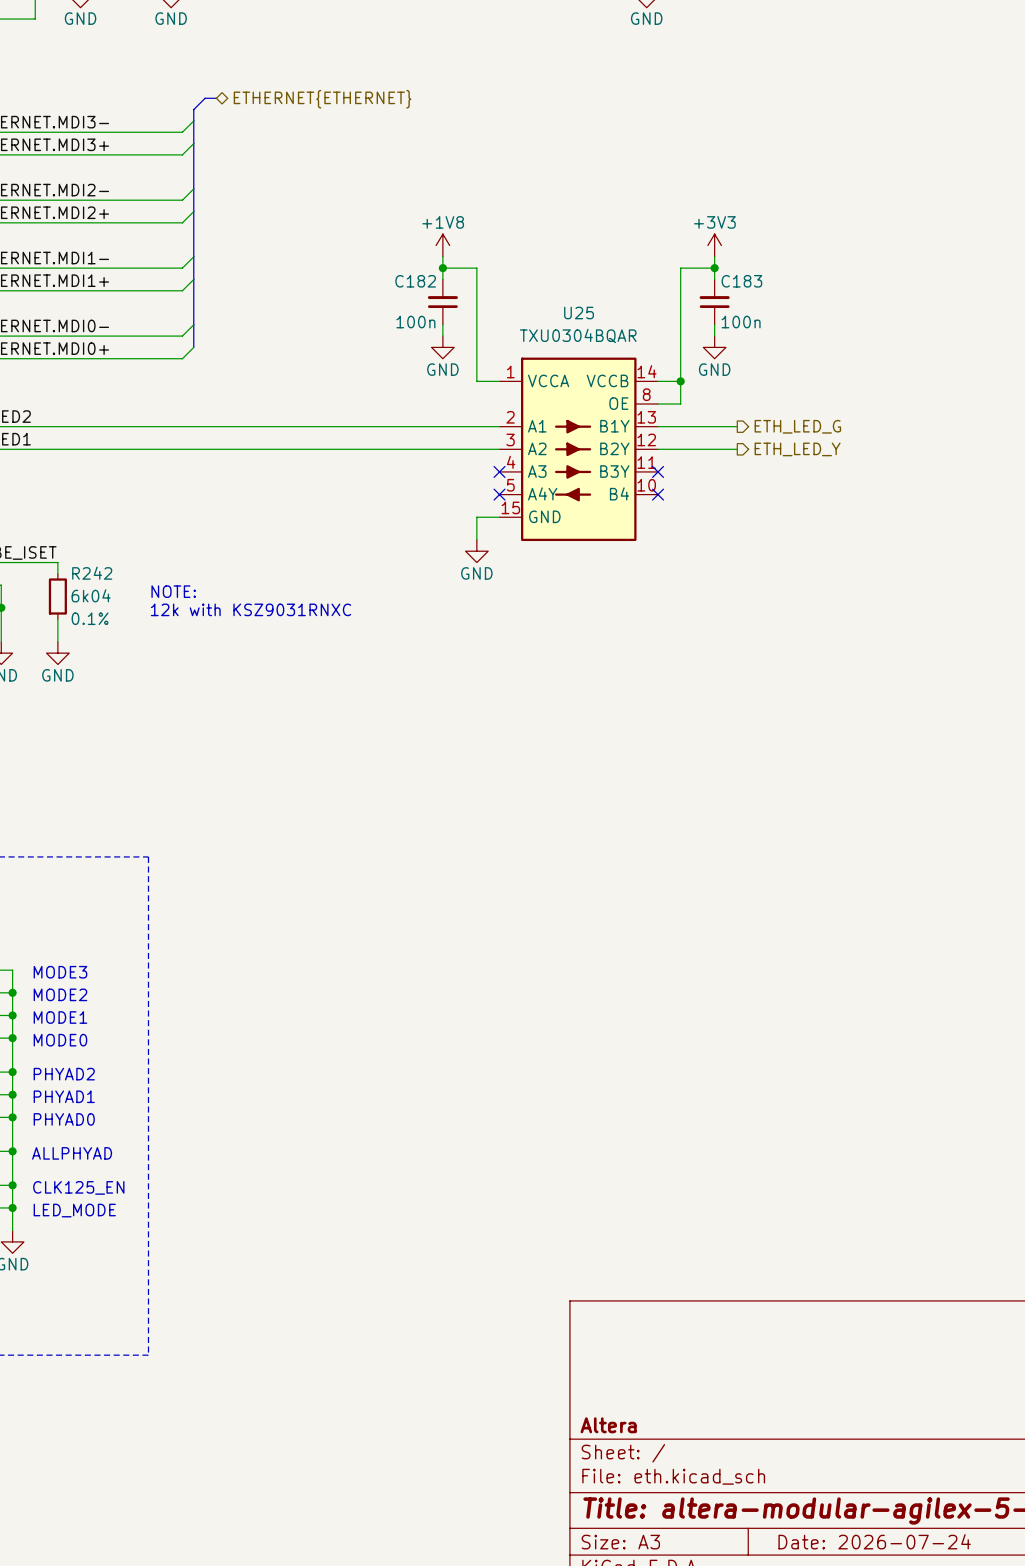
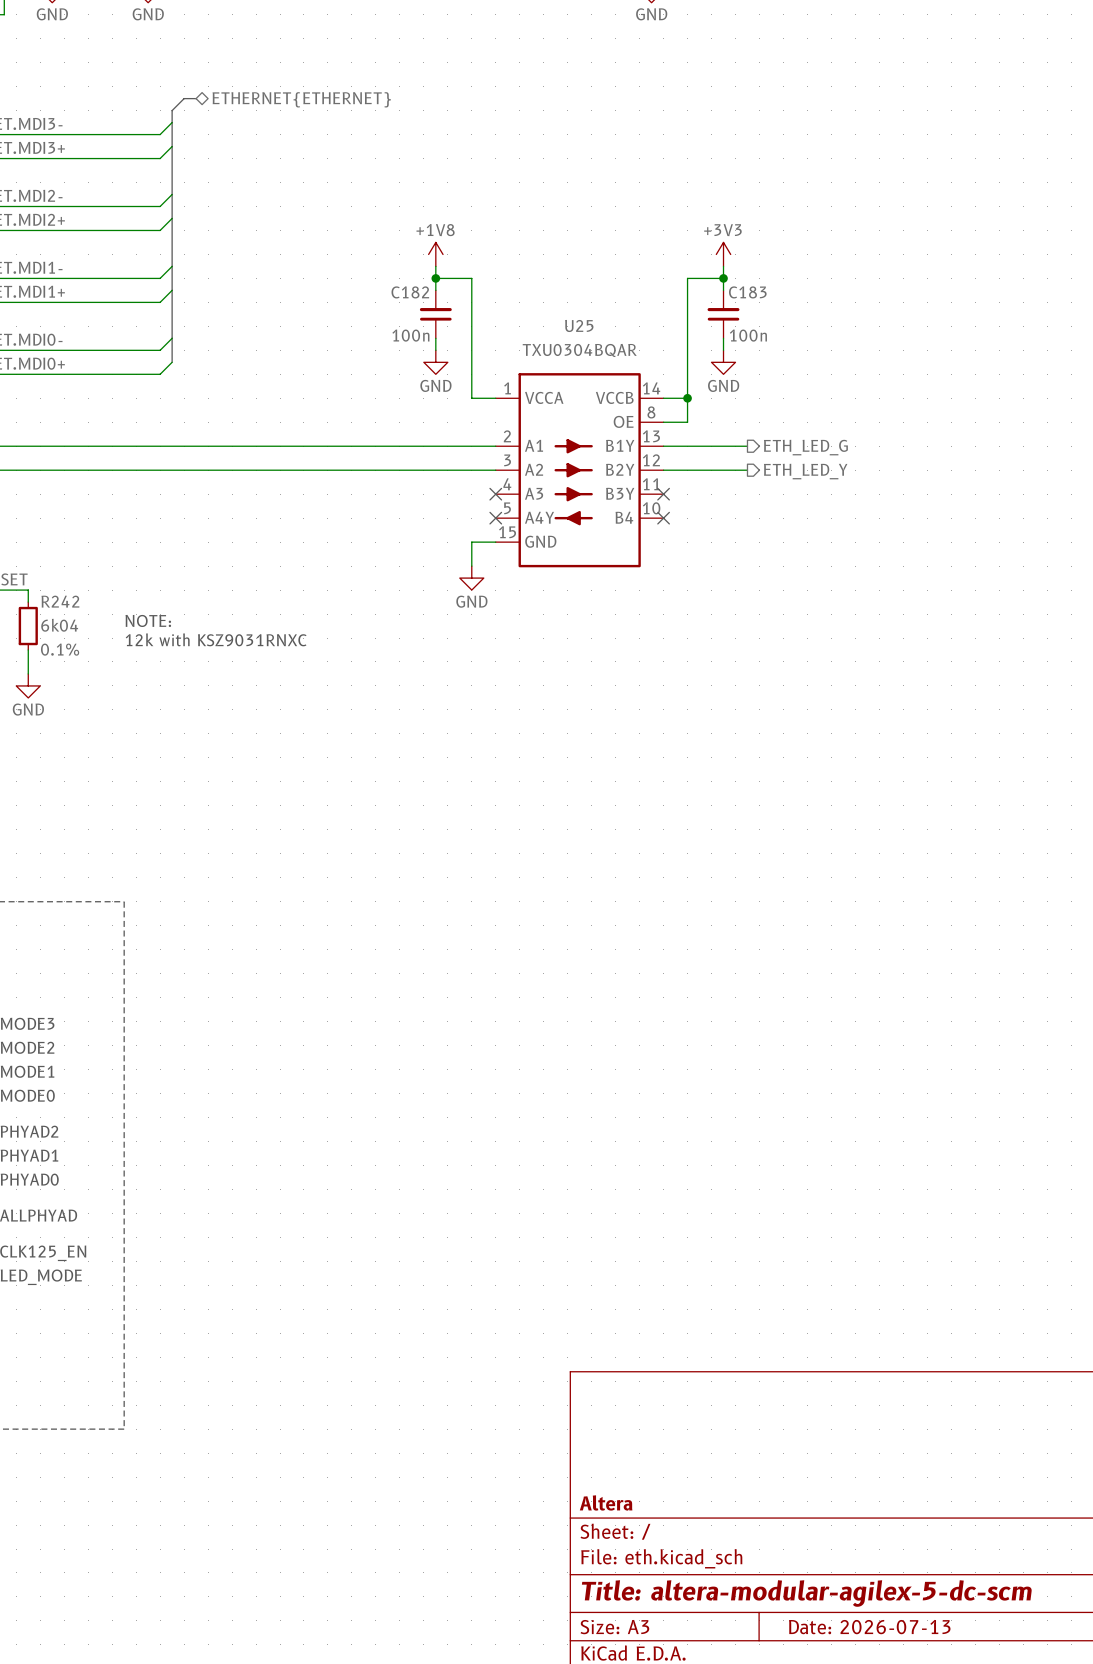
title block: Date: 2026-07-24 (874, 1541) -> Date: 2026-07-13 (869, 1627)

